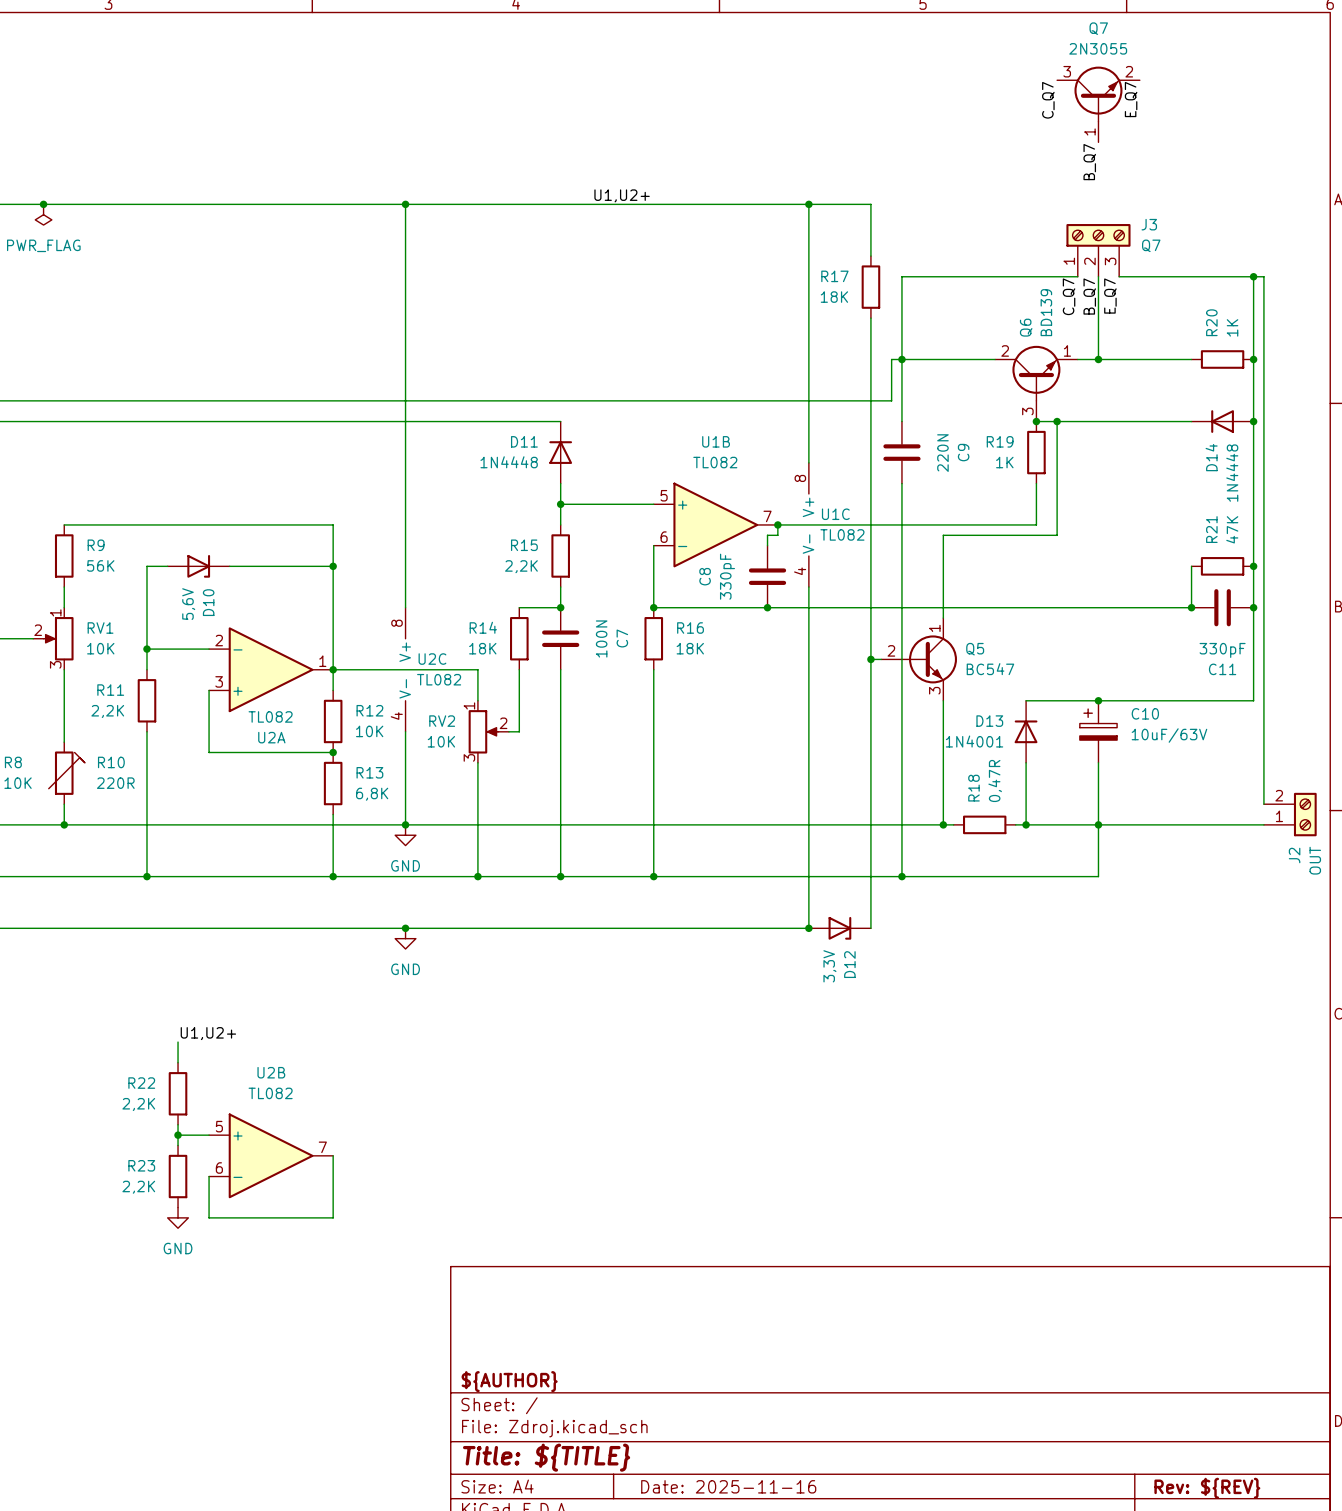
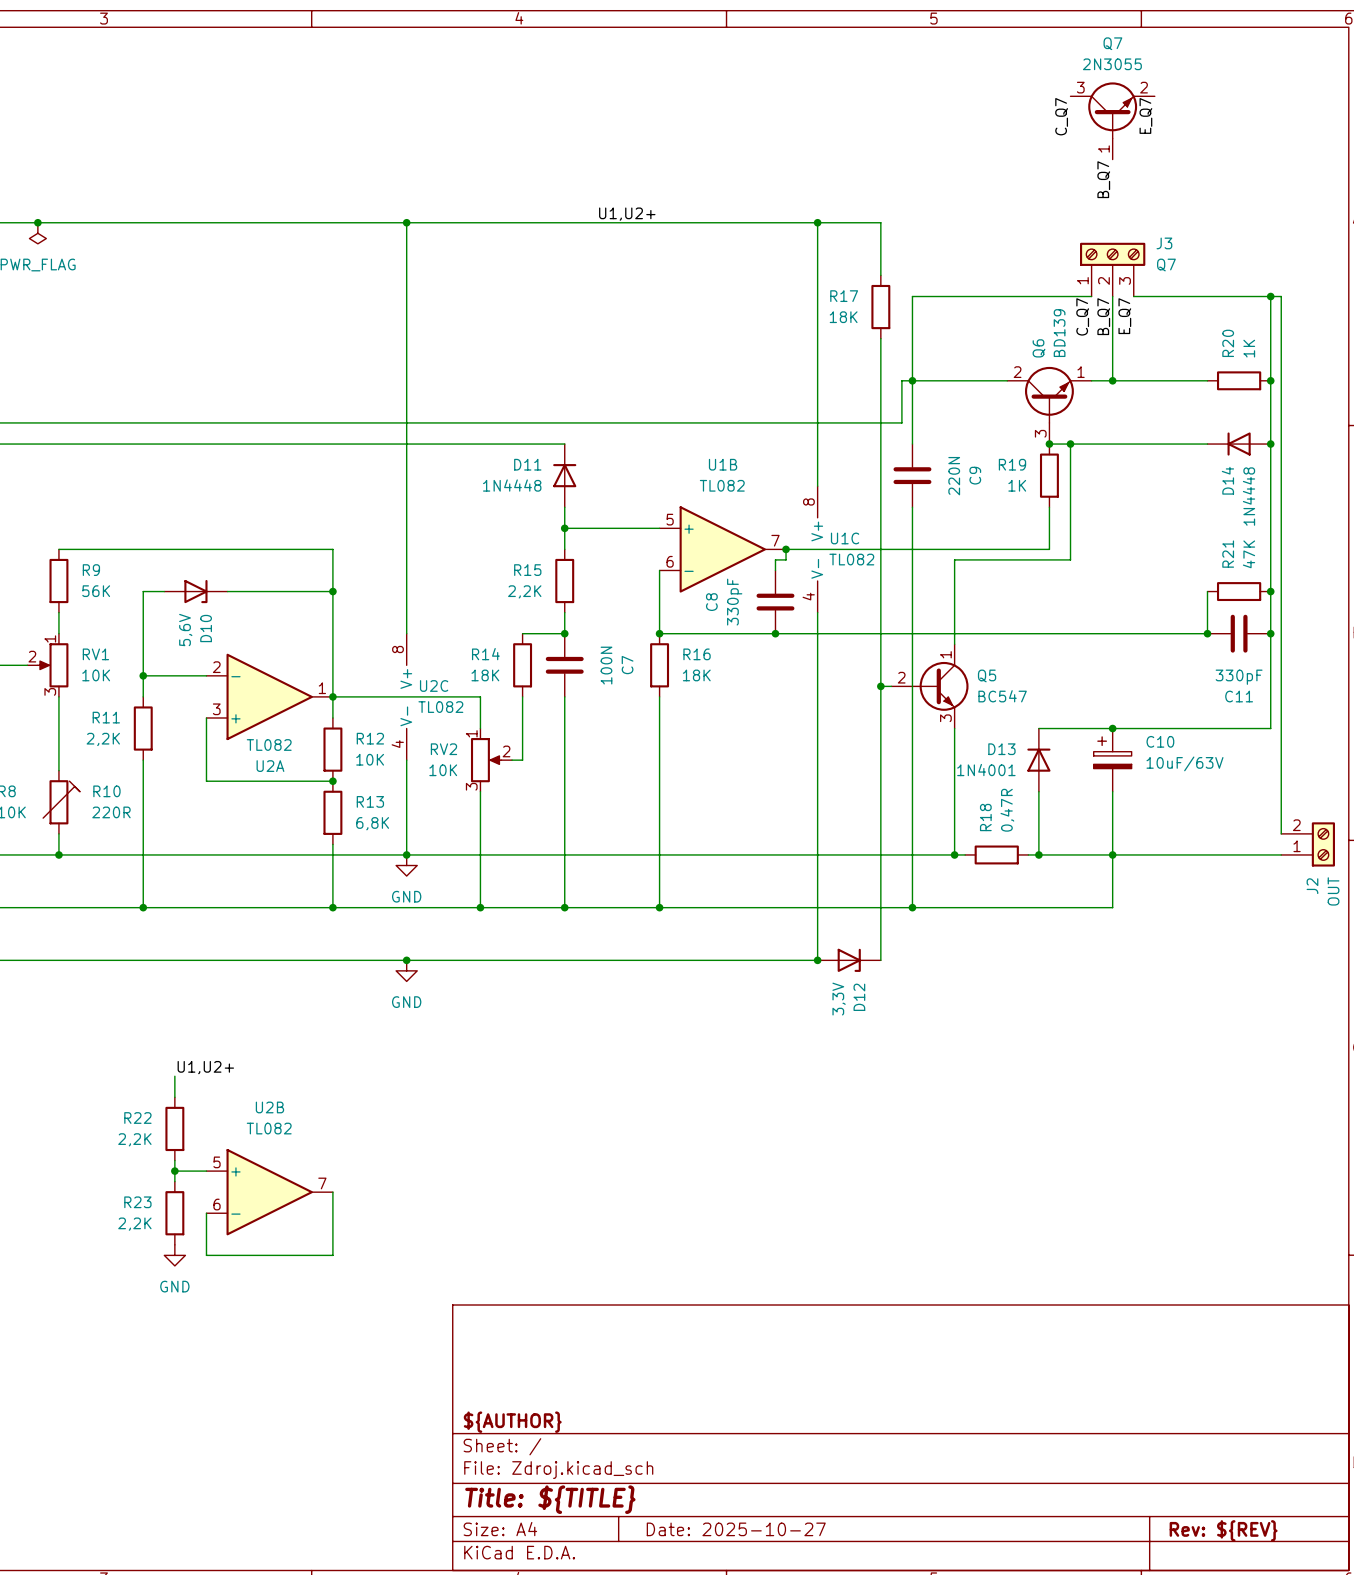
title block: Date: 2025-11-16 (728, 1486) -> Date: 2025-10-27 (736, 1529)

